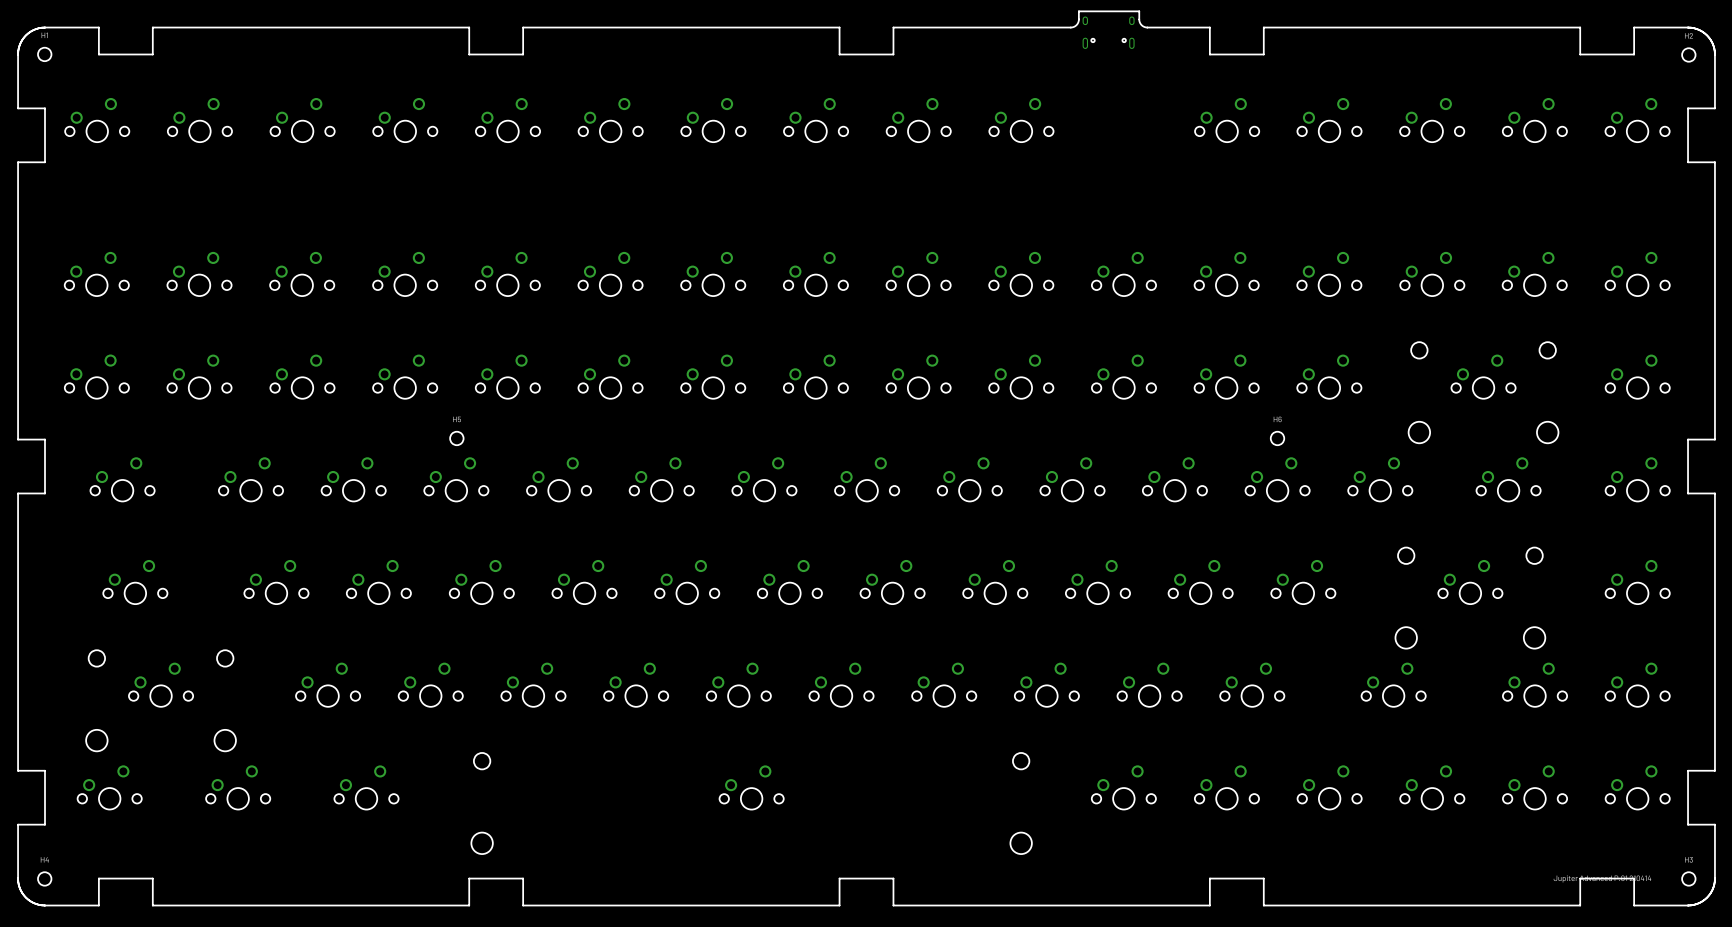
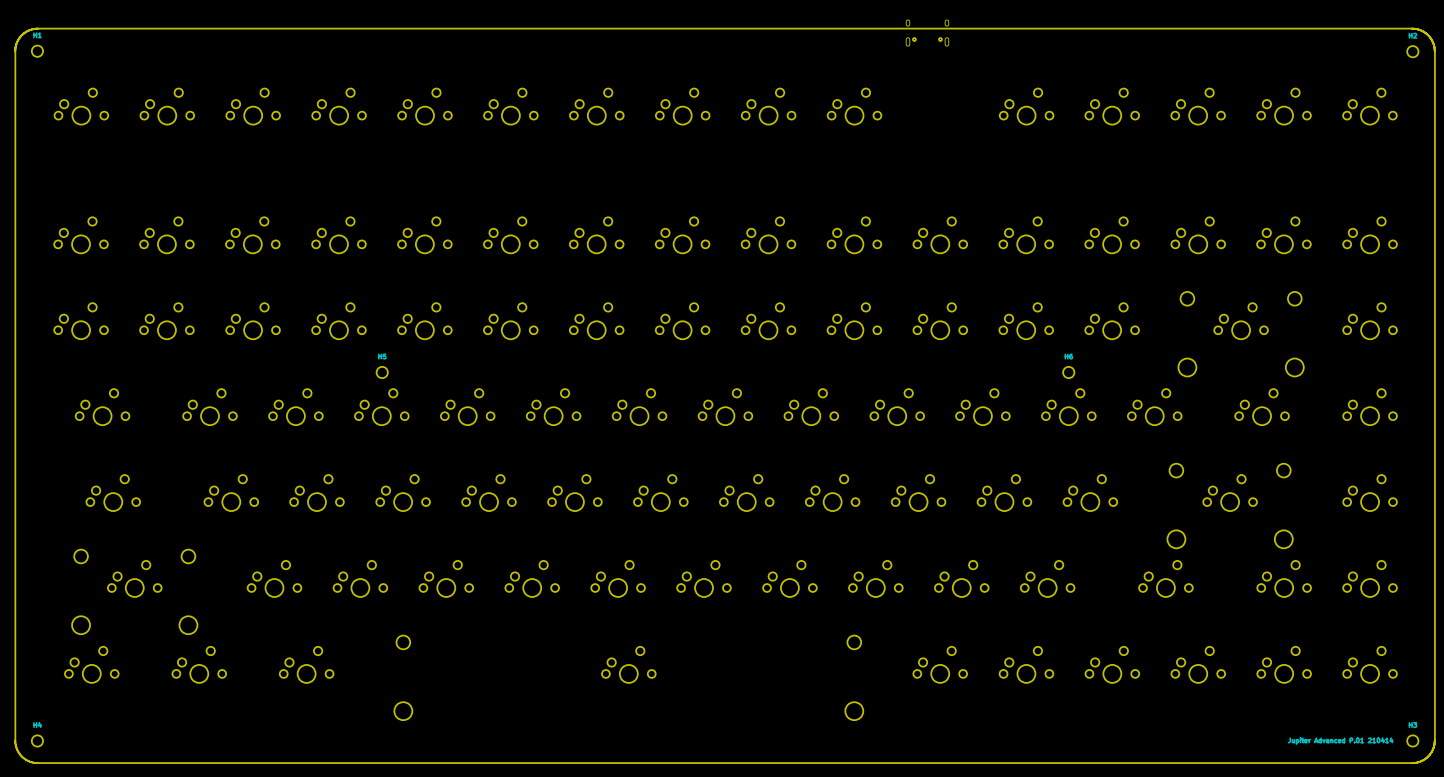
board edge: (44, 27) (98, 27) (98, 54) (152, 54) (152, 27) (469, 27) (469, 54) (523, 54) (523, 27) (839, 27) (839, 54) (893, 54) (893, 27) (1071, 27) (1078, 22) (1078, 11) (1139, 11) (1139, 22) (1145, 27) (1209, 27) (1209, 54) (1263, 54) (1263, 27) (1580, 27) (1580, 54) (1634, 54) (1634, 27) (1688, 27) -> none
board edge: none -> (37, 28) (1412, 28) (1422, 30) (1431, 39) (1434, 51) (1434, 740) (1432, 750) (1424, 759) (1412, 763) (37, 763) (28, 760) (18, 752) (15, 740) (15, 51) (16, 43) (21, 35) (30, 29) (37, 28)
board edge: (18, 54) (18, 108) (44, 108) (44, 162) (18, 162) (18, 439) (44, 439) (44, 493) (18, 493) (18, 770) (44, 770) (44, 824) (18, 824) (18, 884) (23, 895) (33, 902) (44, 905) (98, 905) (98, 878) (152, 878) (152, 905) (469, 905) (469, 878) (523, 878) (523, 905) (839, 905) (839, 878) (893, 878) (893, 905) (1209, 905) (1209, 878) (1263, 878) (1263, 905) (1580, 905) (1580, 878) (1634, 878) (1634, 905) (1688, 905) -> none
board edge: (1714, 54) (1714, 108) (1688, 108) (1688, 162) (1714, 162) (1714, 439) (1688, 439) (1688, 493) (1714, 493) (1714, 770) (1688, 770) (1688, 824) (1714, 824) (1714, 878) -> none

